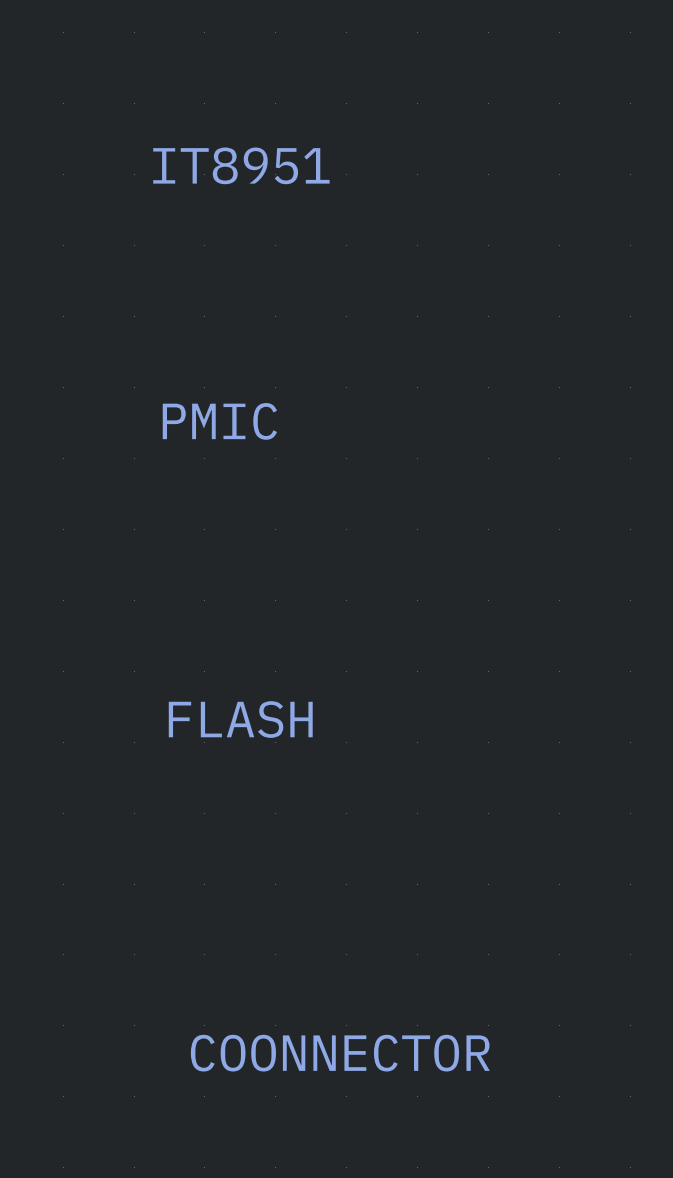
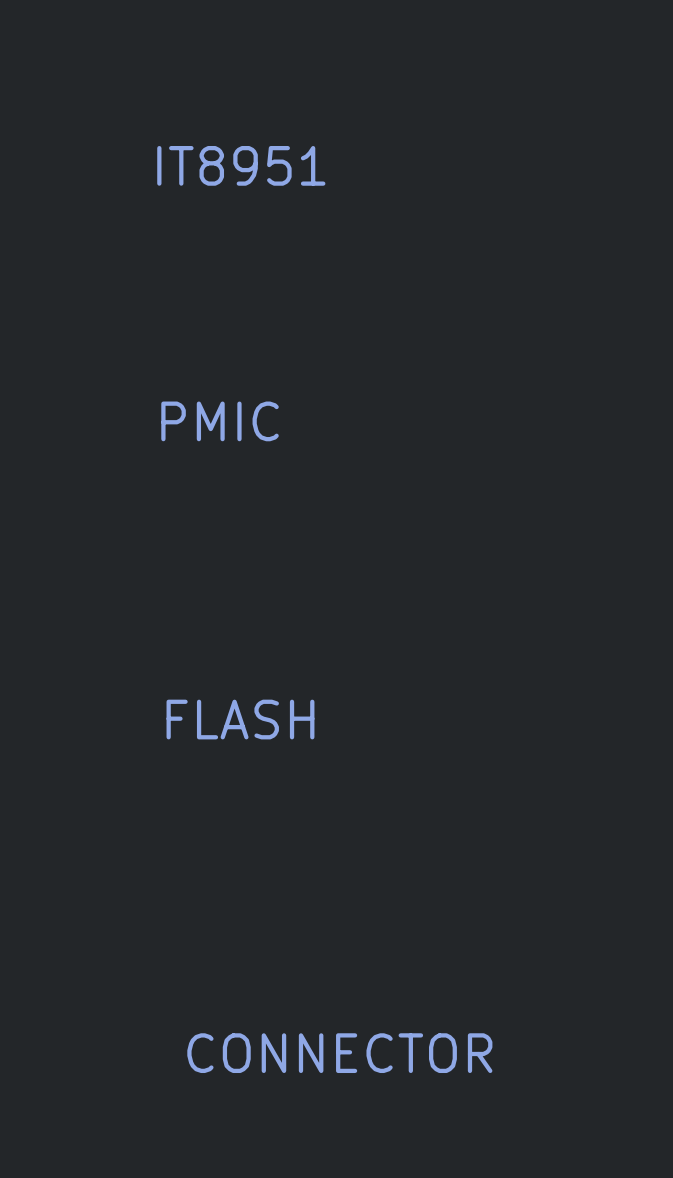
text: COONNECTOR (340, 1053) -> CONNECTOR (339, 1053)

